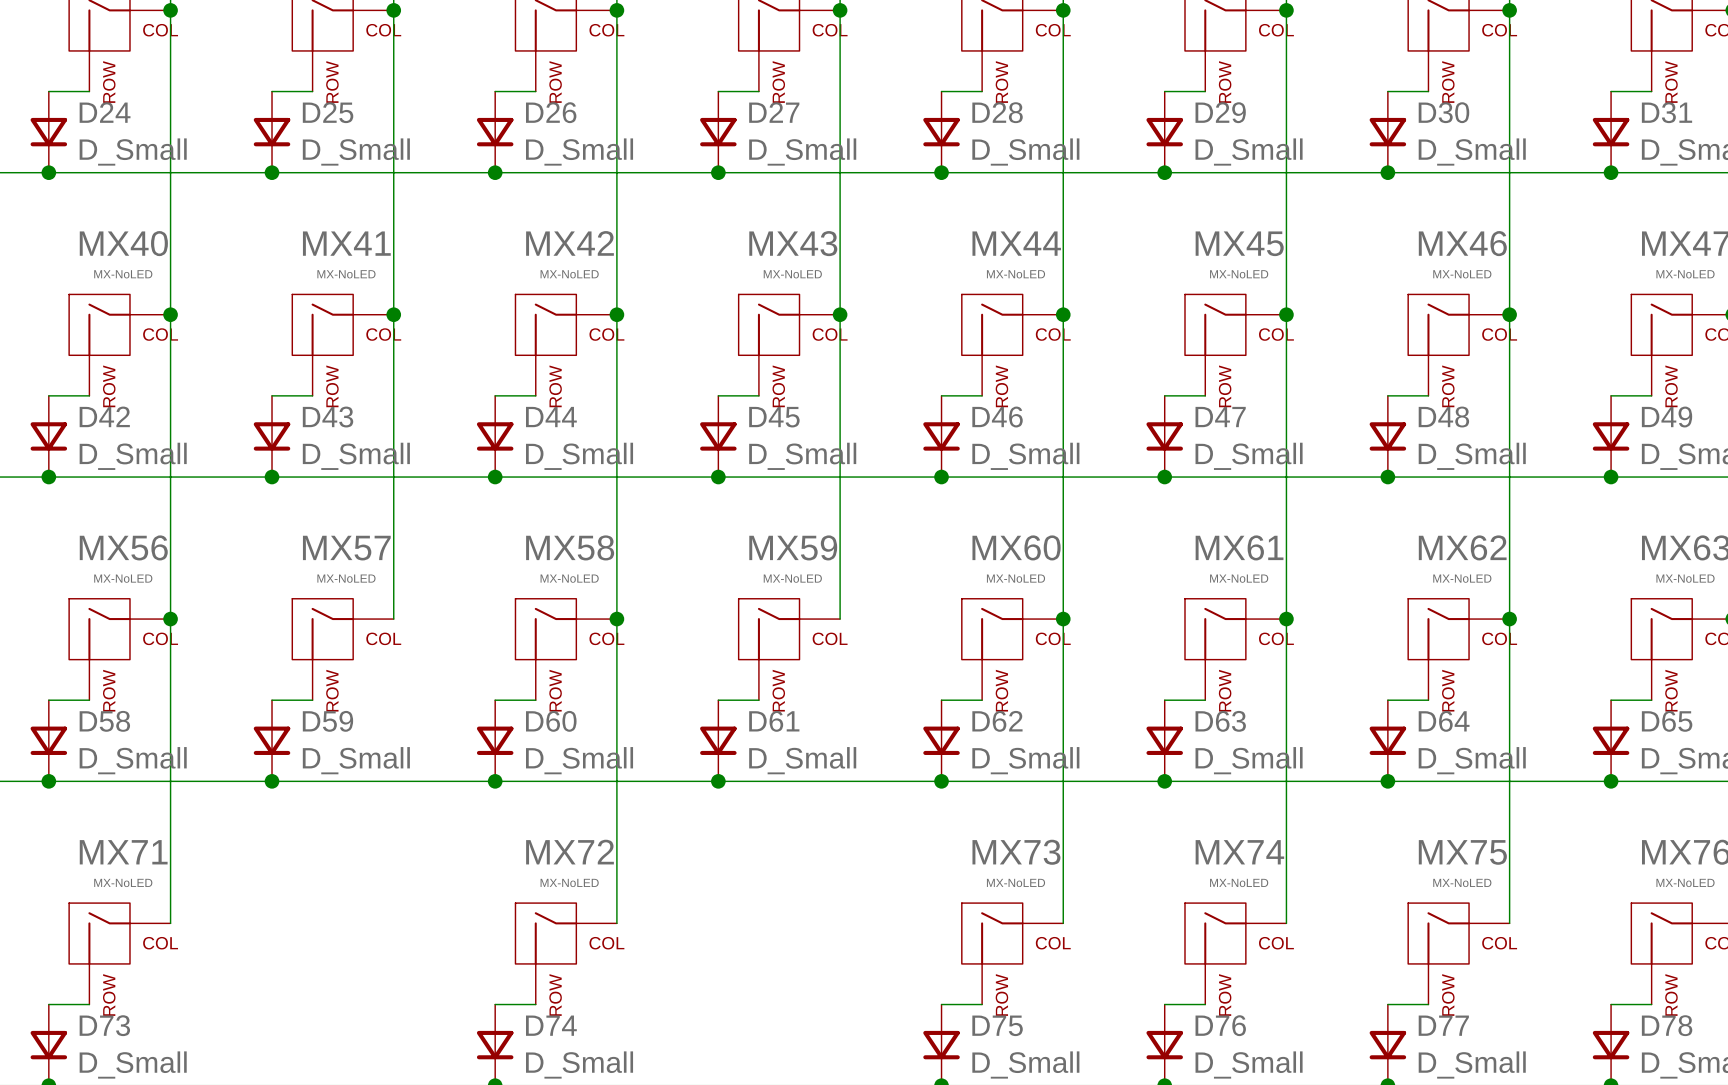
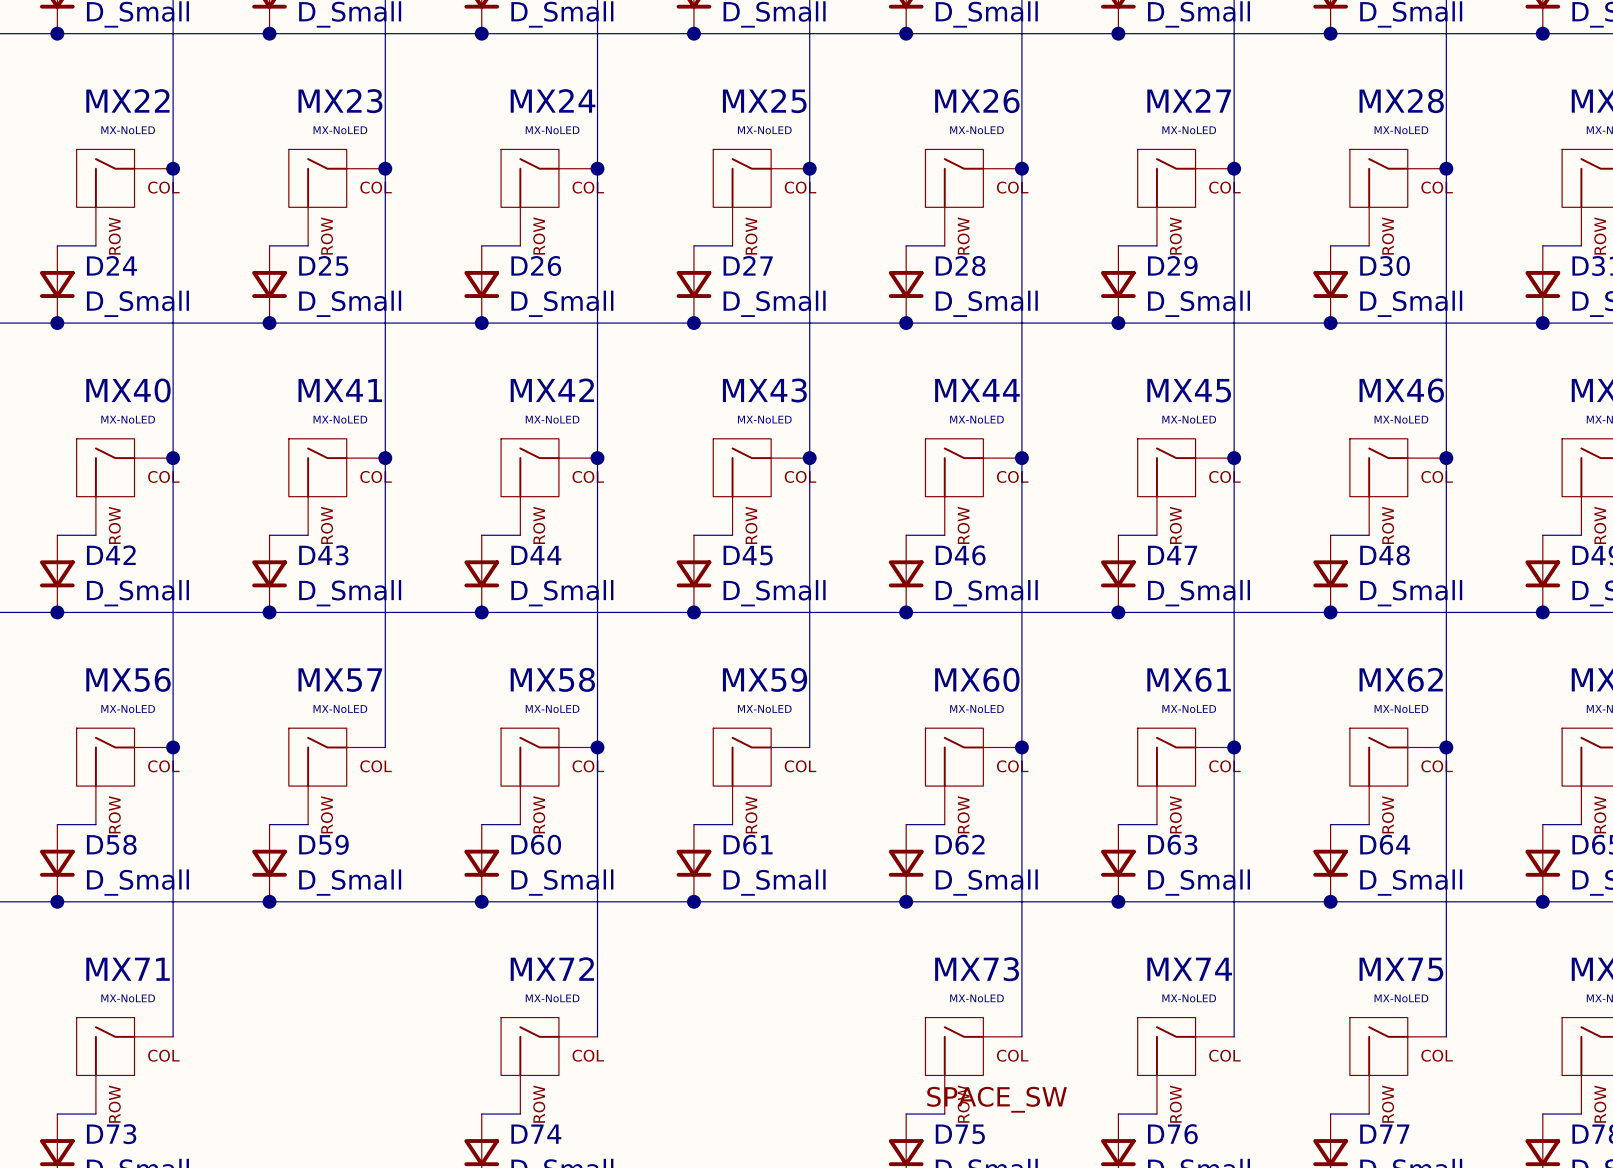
label: none -> SPACE_SW (997, 1099)

